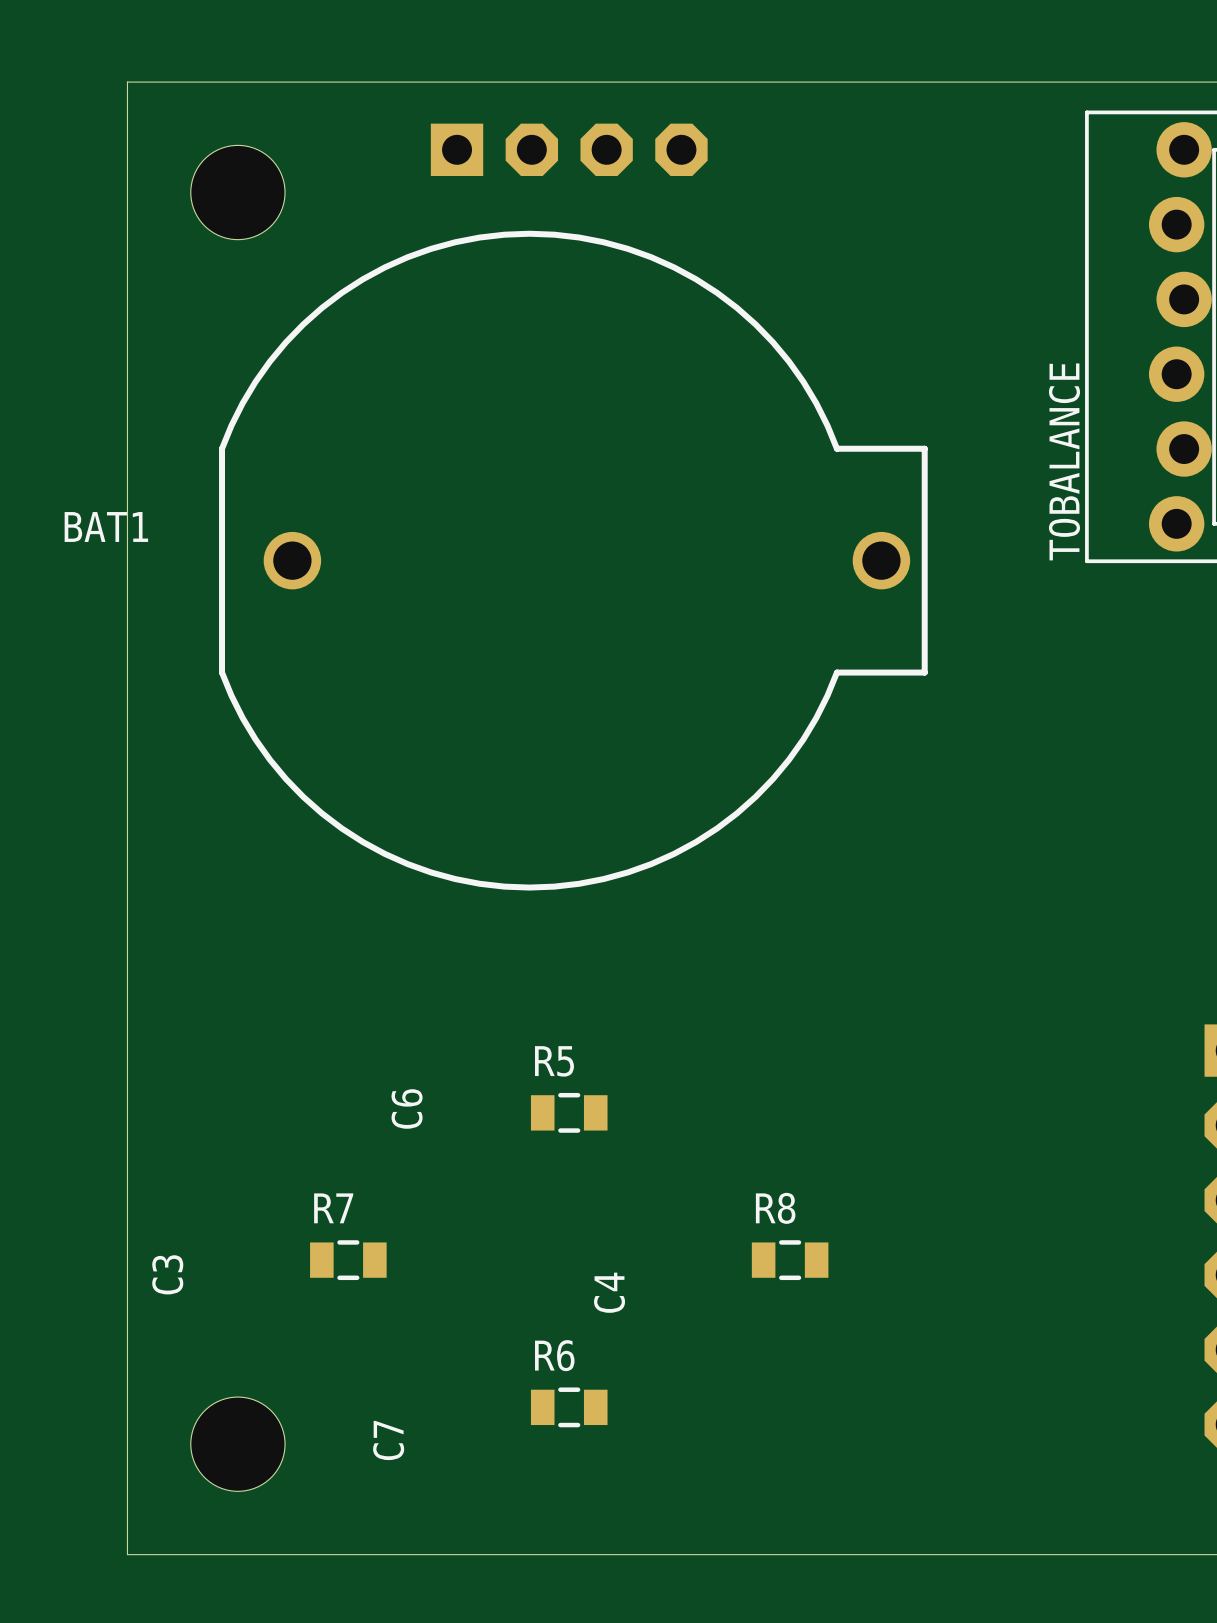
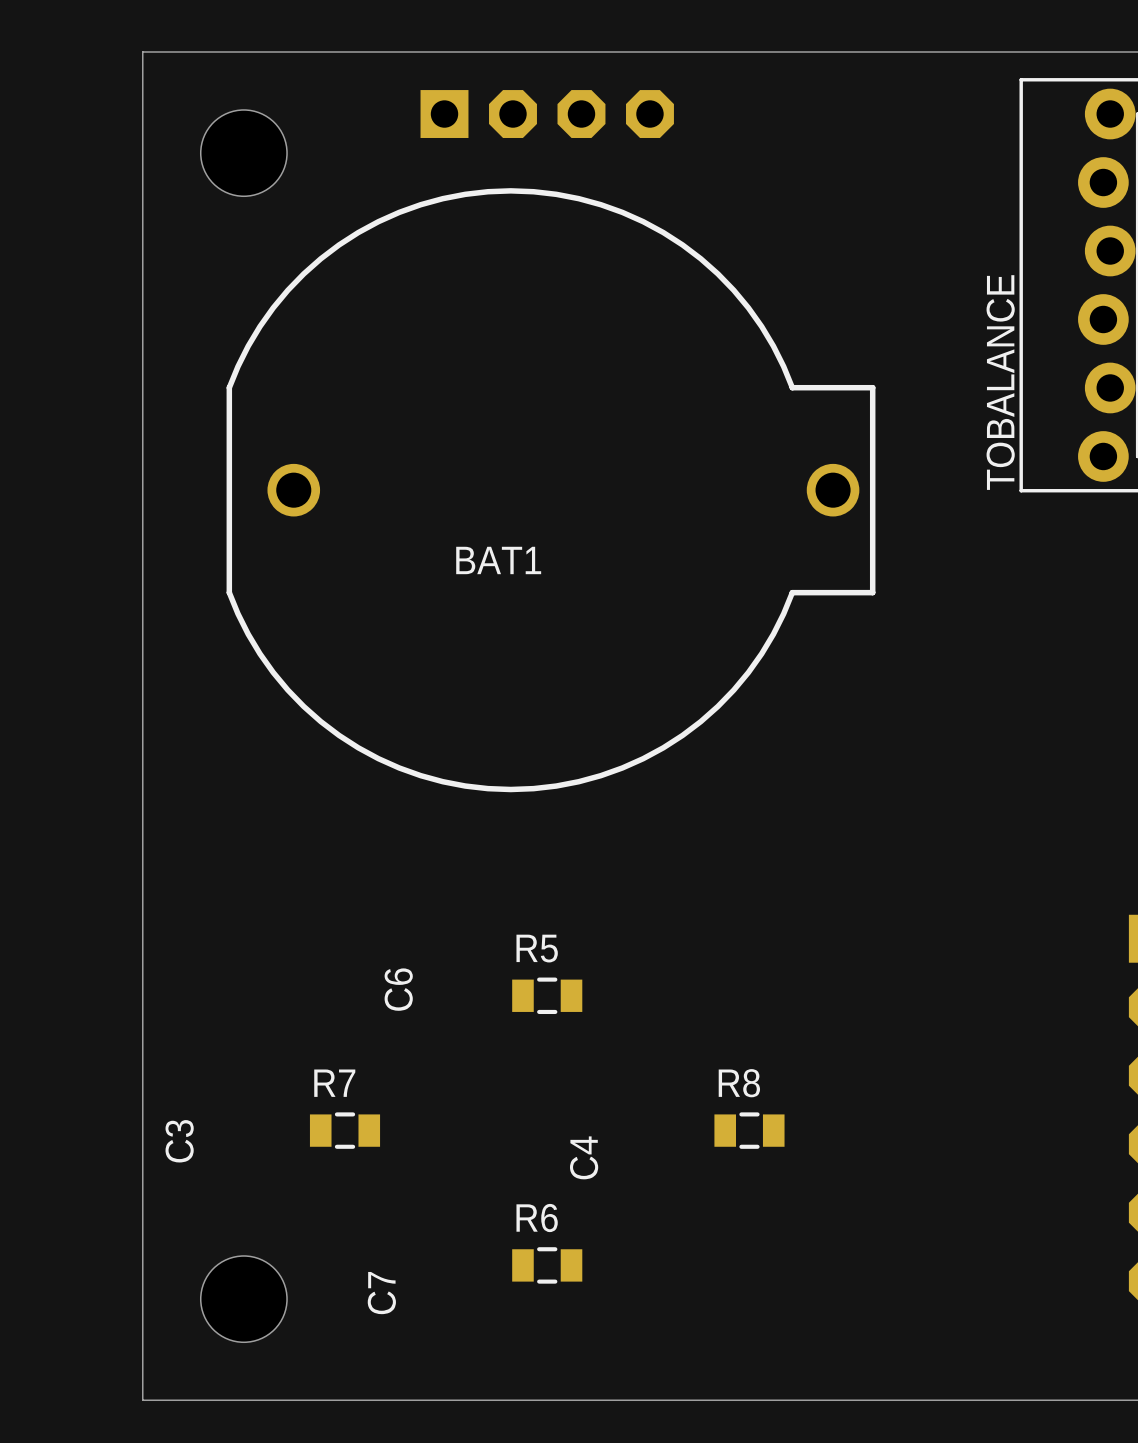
BAT1 name position: BAT1 (106, 526) -> BAT1 (498, 560)

